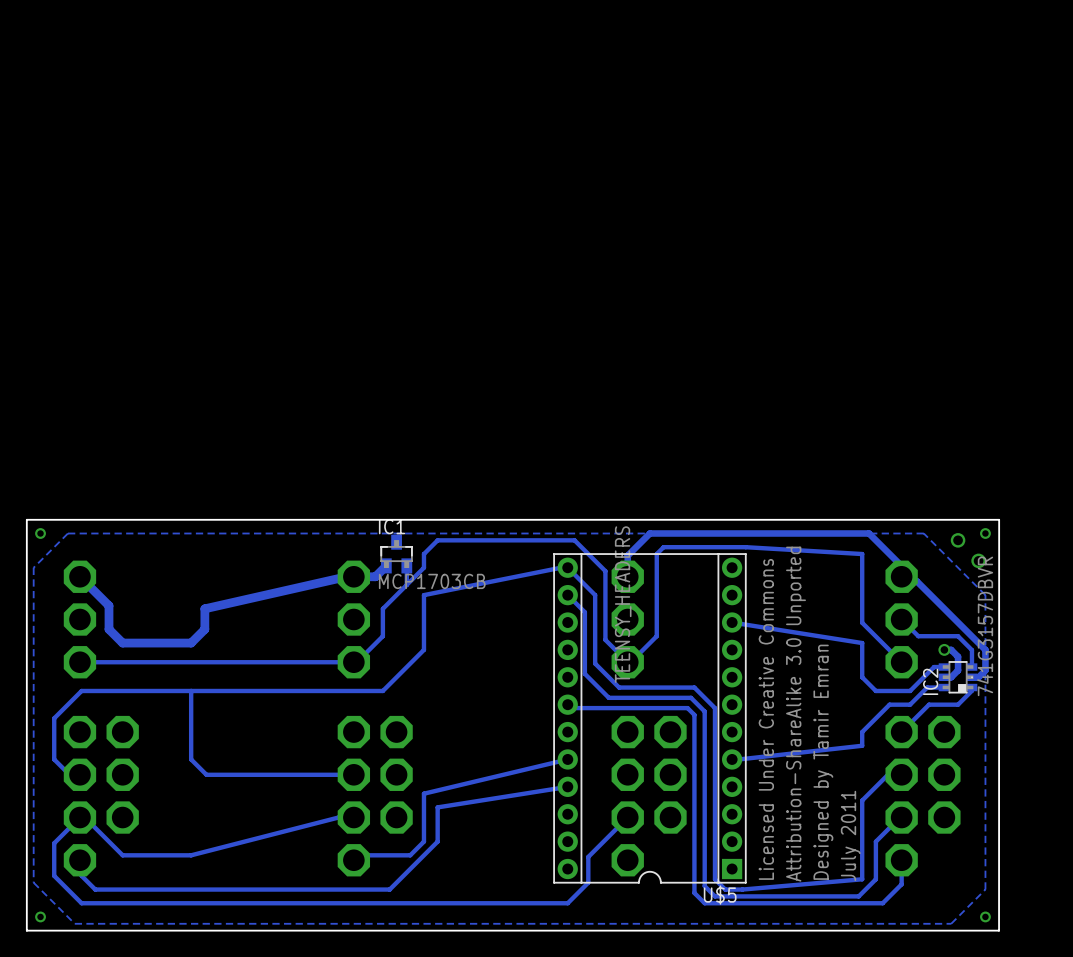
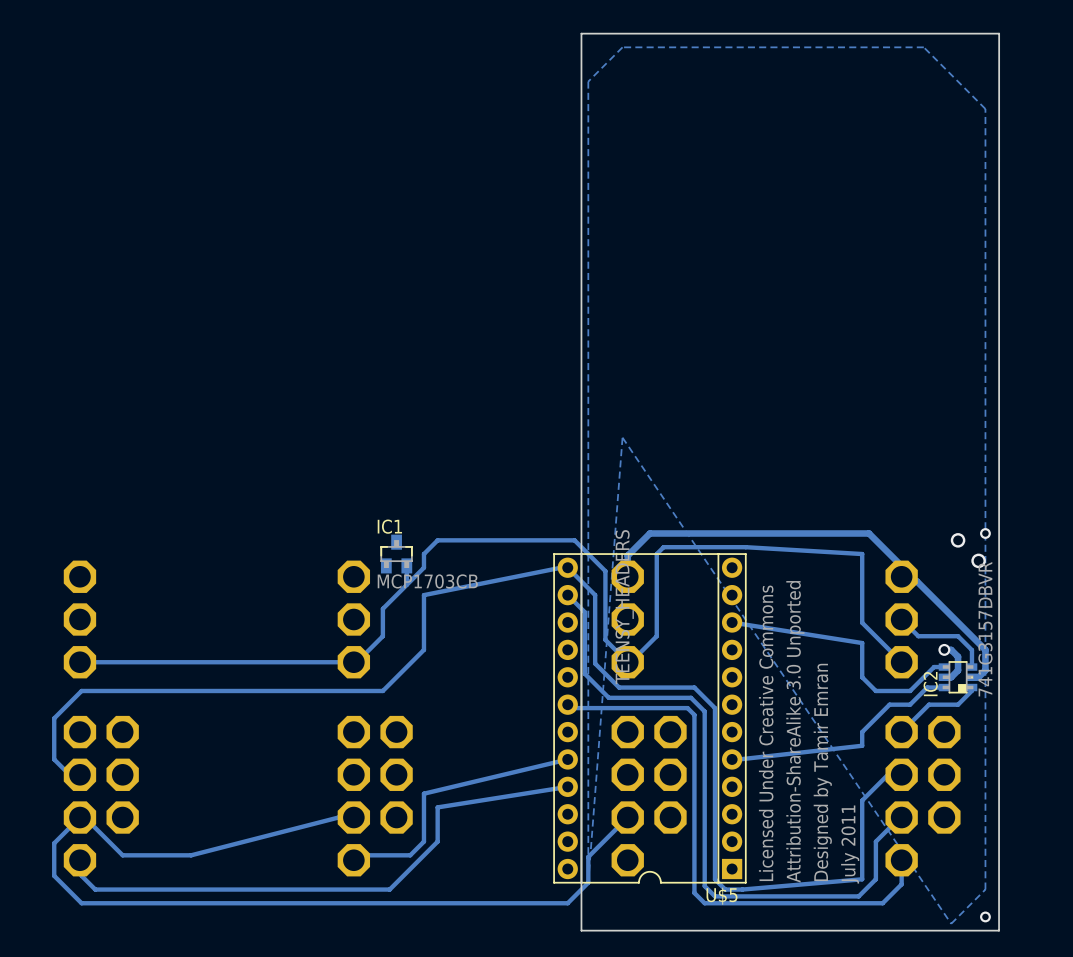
board edge: (999, 519) (26, 519) (26, 930) (581, 930) -> (999, 519) (999, 33) (581, 33) (581, 930)
via: (40, 533) -> none
track: (386, 565) (375, 576) (346, 576) (204, 608) (204, 629) (191, 643) (122, 643) (108, 629) (108, 605) (79, 576) -> none
zone outline: (985, 595) (923, 533) (67, 533) (33, 567) (33, 882) (74, 923) (951, 923) -> (985, 595) (985, 108) (923, 47) (622, 47) (588, 81) (588, 882) (622, 437) (951, 923)
track: (191, 690) (191, 759) (206, 774) (353, 774) -> none
via: (40, 916) -> none

